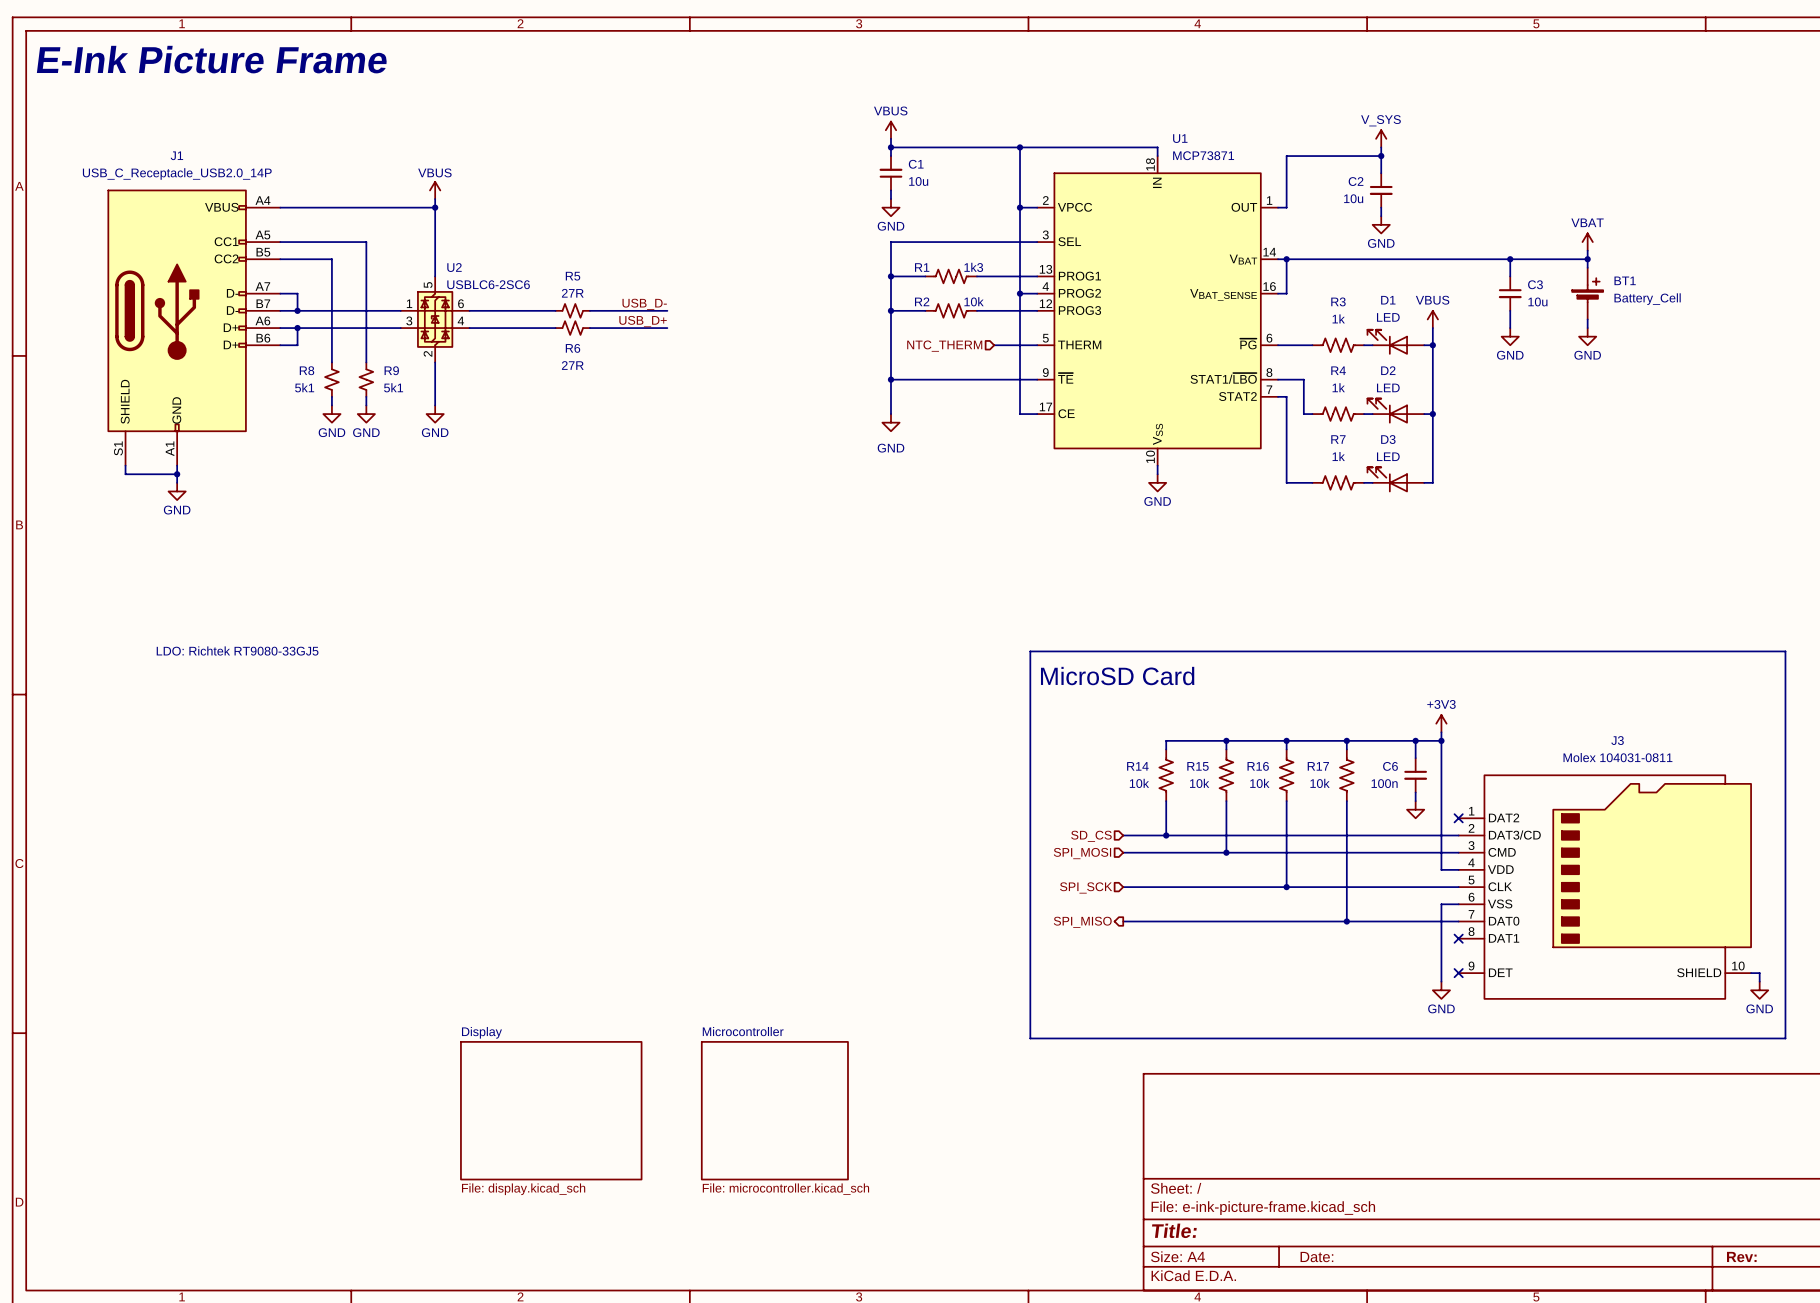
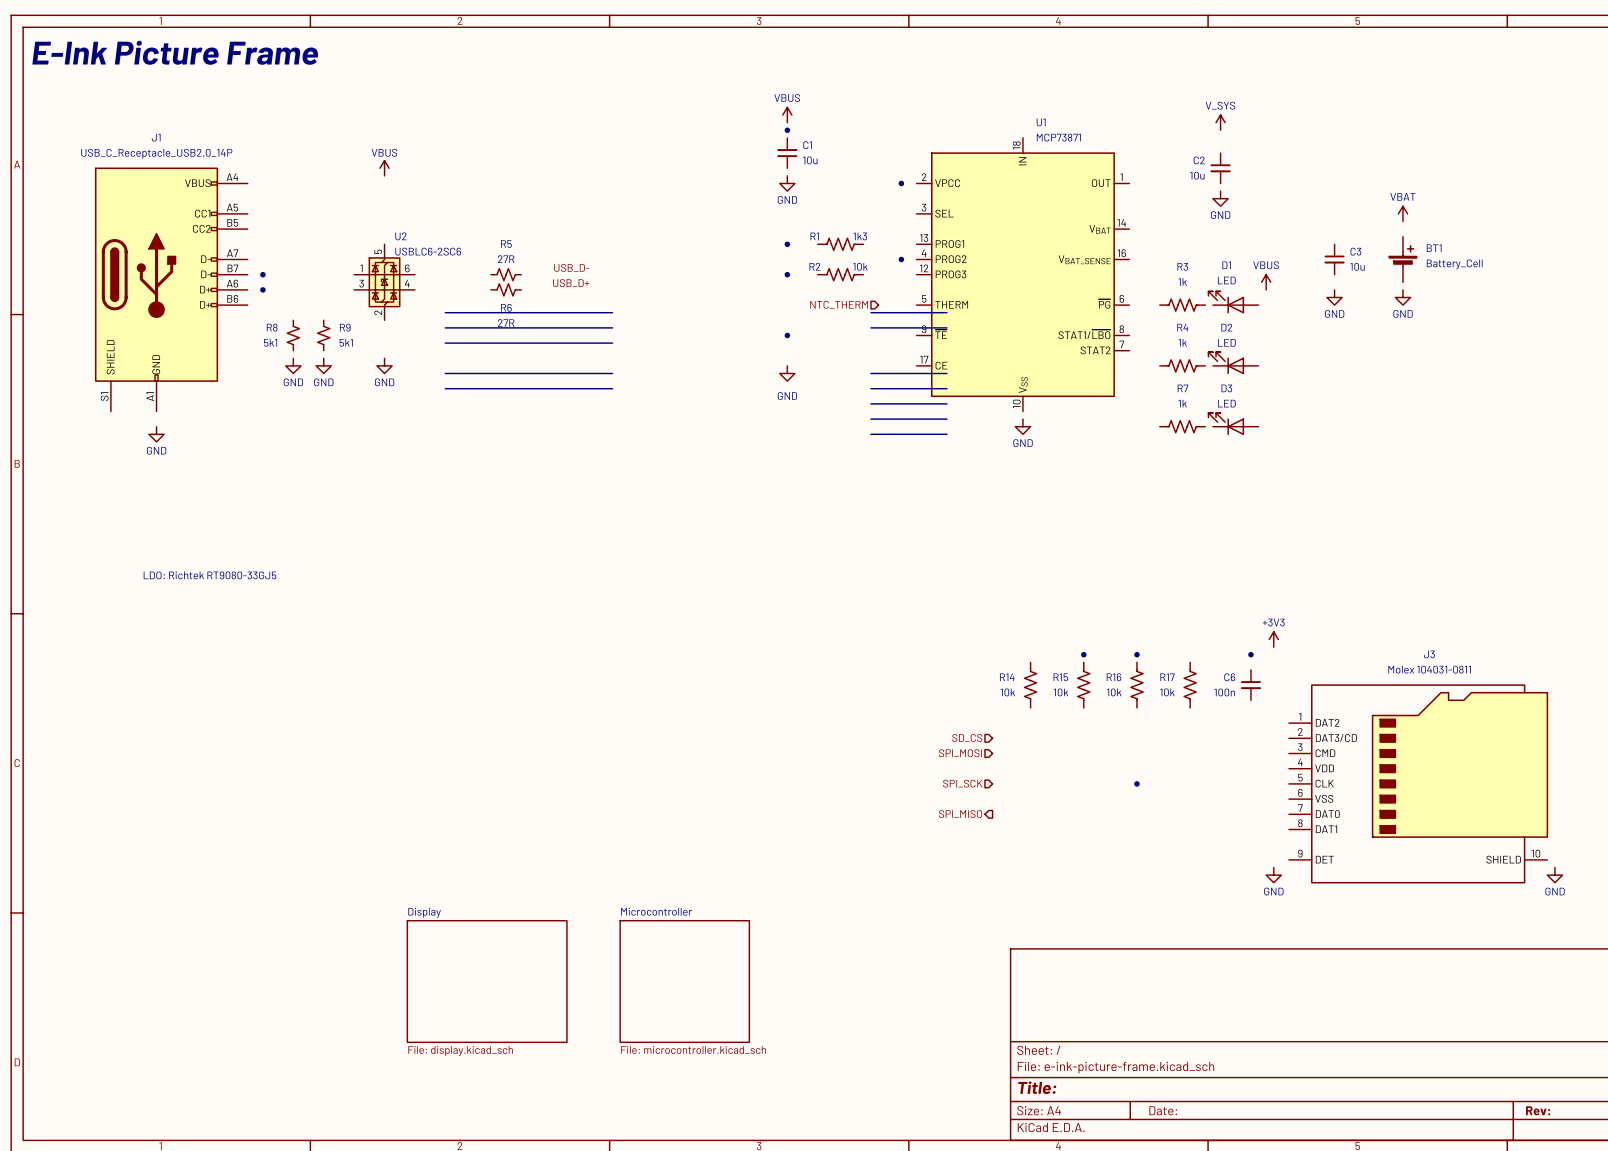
wire: (890, 138) (890, 156) -> none
wire: (890, 147) (1157, 147) (1157, 156) -> none
wire: (1020, 147) (1020, 414) (1037, 414) -> none
junction: (1020, 147) -> none
wire: (1381, 147) (1381, 173) -> none
wire: (1381, 156) (1286, 156) (1286, 207) (1278, 207) -> none
junction: (1381, 156) -> none
wire: (890, 190) (890, 199) -> none
wire: (435, 199) (435, 276) -> none
wire: (280, 207) (435, 207) -> none
junction: (435, 207) -> none
wire: (1020, 207) (1037, 207) -> none
wire: (1381, 207) (1381, 216) -> none
wire: (280, 242) (366, 242) (366, 362) -> none
wire: (1037, 242) (890, 242) (890, 414) -> none
wire: (1587, 250) (1587, 267) -> none
wire: (280, 259) (331, 259) (331, 362) -> none
wire: (1278, 259) (1587, 259) -> none
wire: (1286, 259) (1286, 293) (1278, 293) -> none
junction: (1286, 259) -> none
wire: (1510, 259) (1510, 276) -> none
junction: (1510, 259) -> none
junction: (1587, 259) -> none
wire: (890, 276) (925, 276) -> none
wire: (977, 276) (1037, 276) -> none
wire: (280, 293) (297, 293) (297, 310) -> none
wire: (1020, 293) (1037, 293) -> none
wire: (280, 310) (400, 310) -> none
wire: (469, 310) (555, 310) -> none
wire: (589, 310) (667, 310) -> none
wire: (890, 310) (925, 310) -> none
wire: (977, 310) (1037, 310) -> none
wire: (1510, 310) (1510, 328) -> none
wire: (1587, 319) (1587, 328) -> none
wire: (280, 328) (400, 328) -> none
wire: (297, 328) (297, 345) (280, 345) -> none
wire: (469, 328) (555, 328) -> none
wire: (589, 328) (667, 328) -> none
wire: (1432, 328) (1432, 482) (1424, 482) -> none
wire: (994, 345) (1037, 345) -> none
wire: (1278, 345) (1312, 345) -> none
wire: (1364, 345) (1372, 345) -> none
wire: (1424, 345) (1432, 345) -> none
junction: (1432, 345) -> none
wire: none -> (445, 312) (612, 312)
wire: none -> (870, 312) (946, 312)
wire: (435, 362) (435, 405) -> none
wire: none -> (445, 327) (612, 327)
wire: none -> (870, 327) (946, 327)
wire: (890, 379) (1037, 379) -> none
wire: (1278, 379) (1303, 379) (1303, 414) (1312, 414) -> none
wire: none -> (445, 343) (612, 343)
wire: (331, 396) (331, 405) -> none
wire: (366, 396) (366, 405) -> none
wire: (1278, 396) (1286, 396) (1286, 482) (1312, 482) -> none
wire: (1364, 414) (1372, 414) -> none
wire: (1424, 414) (1432, 414) -> none
junction: (1432, 414) -> none
wire: none -> (445, 373) (612, 373)
wire: none -> (870, 373) (946, 373)
wire: none -> (445, 388) (612, 388)
wire: none -> (870, 388) (946, 388)
wire: none -> (870, 403) (946, 403)
wire: (125, 465) (125, 474) (177, 474) -> none
wire: (177, 465) (177, 482) -> none
wire: (1157, 465) (1157, 474) -> none
junction: (177, 474) -> none
wire: none -> (870, 419) (946, 419)
wire: (1364, 482) (1372, 482) -> none
wire: none -> (870, 434) (946, 434)
line: (1030, 651) (1785, 651) (1785, 1038) (1030, 1038) (1030, 651) -> none
text: MicroSD Card (1117, 676) -> none
wire: (1441, 732) (1441, 869) (1458, 869) -> none
wire: (1226, 740) (1226, 749) -> none
wire: (1286, 740) (1286, 749) -> none
wire: (1346, 740) (1346, 749) -> none
junction: (1346, 740) -> none
wire: (1415, 740) (1415, 758) -> none
wire: (1441, 740) (1166, 740) (1166, 749) -> none
junction: (1441, 740) -> none
wire: (1415, 792) (1415, 801) -> none
wire: (1166, 801) (1166, 835) -> none
wire: (1226, 801) (1226, 852) -> none
wire: (1286, 801) (1286, 887) -> none
wire: (1346, 801) (1346, 921) -> none
power symbol: (1415, 809) -> none
no-connect mark: (1458, 818) -> none
wire: (1123, 835) (1458, 835) -> none
junction: (1166, 835) -> none
wire: (1123, 852) (1458, 852) -> none
junction: (1226, 852) -> none
wire: (1123, 887) (1458, 887) -> none
wire: (1458, 904) (1441, 904) (1441, 981) -> none
wire: (1123, 921) (1458, 921) -> none
junction: (1346, 921) -> none
no-connect mark: (1458, 938) -> none
no-connect mark: (1458, 973) -> none
wire: (1751, 973) (1759, 973) (1759, 981) -> none

